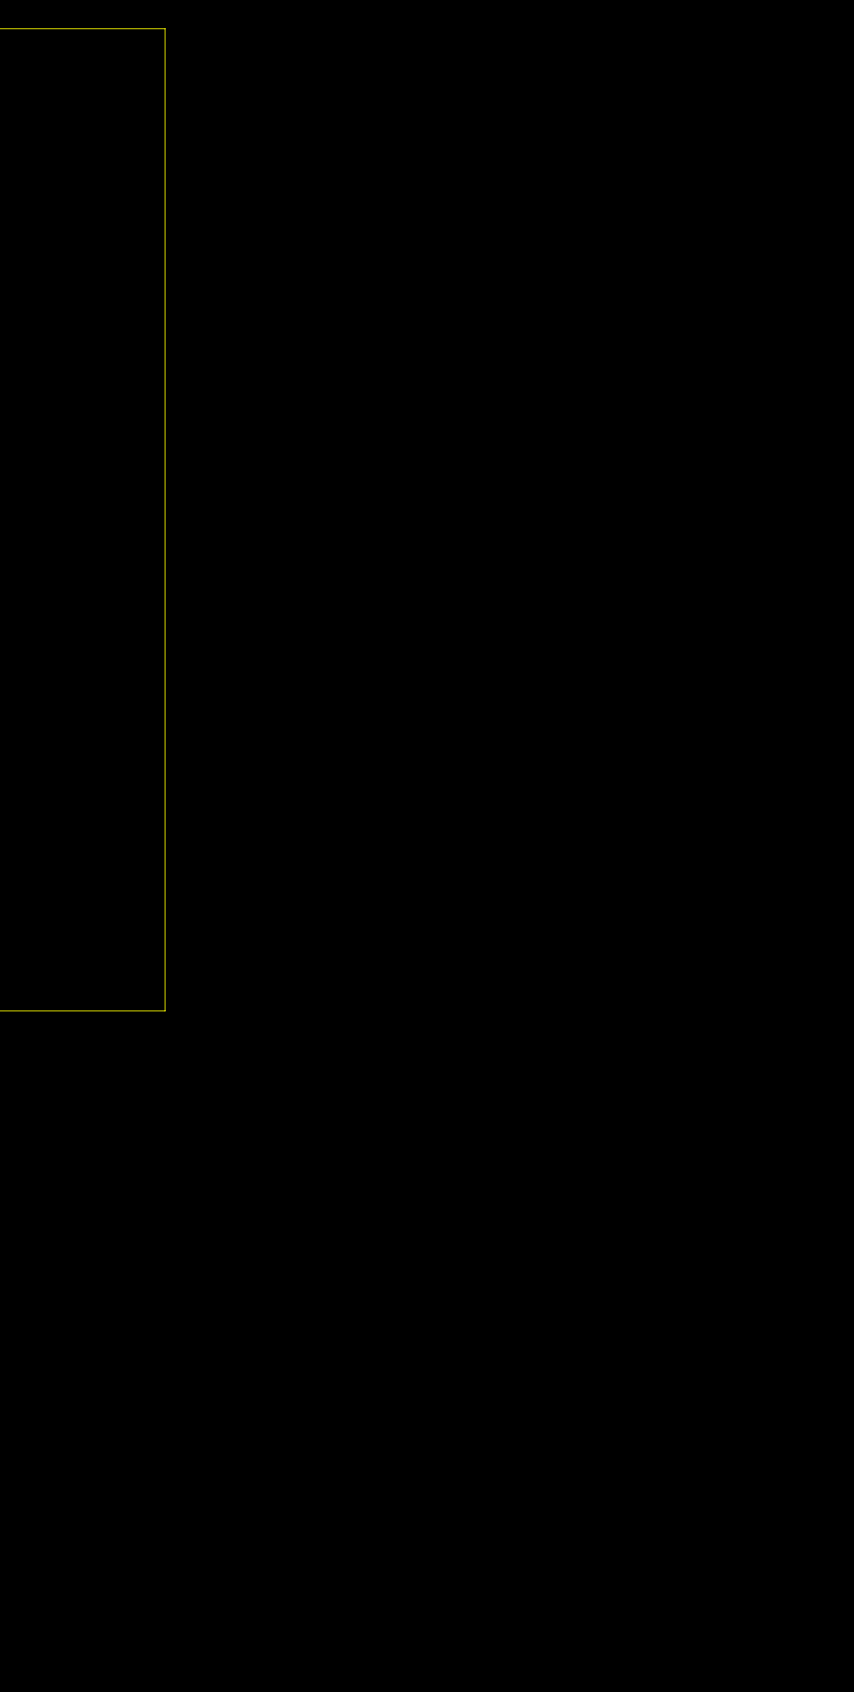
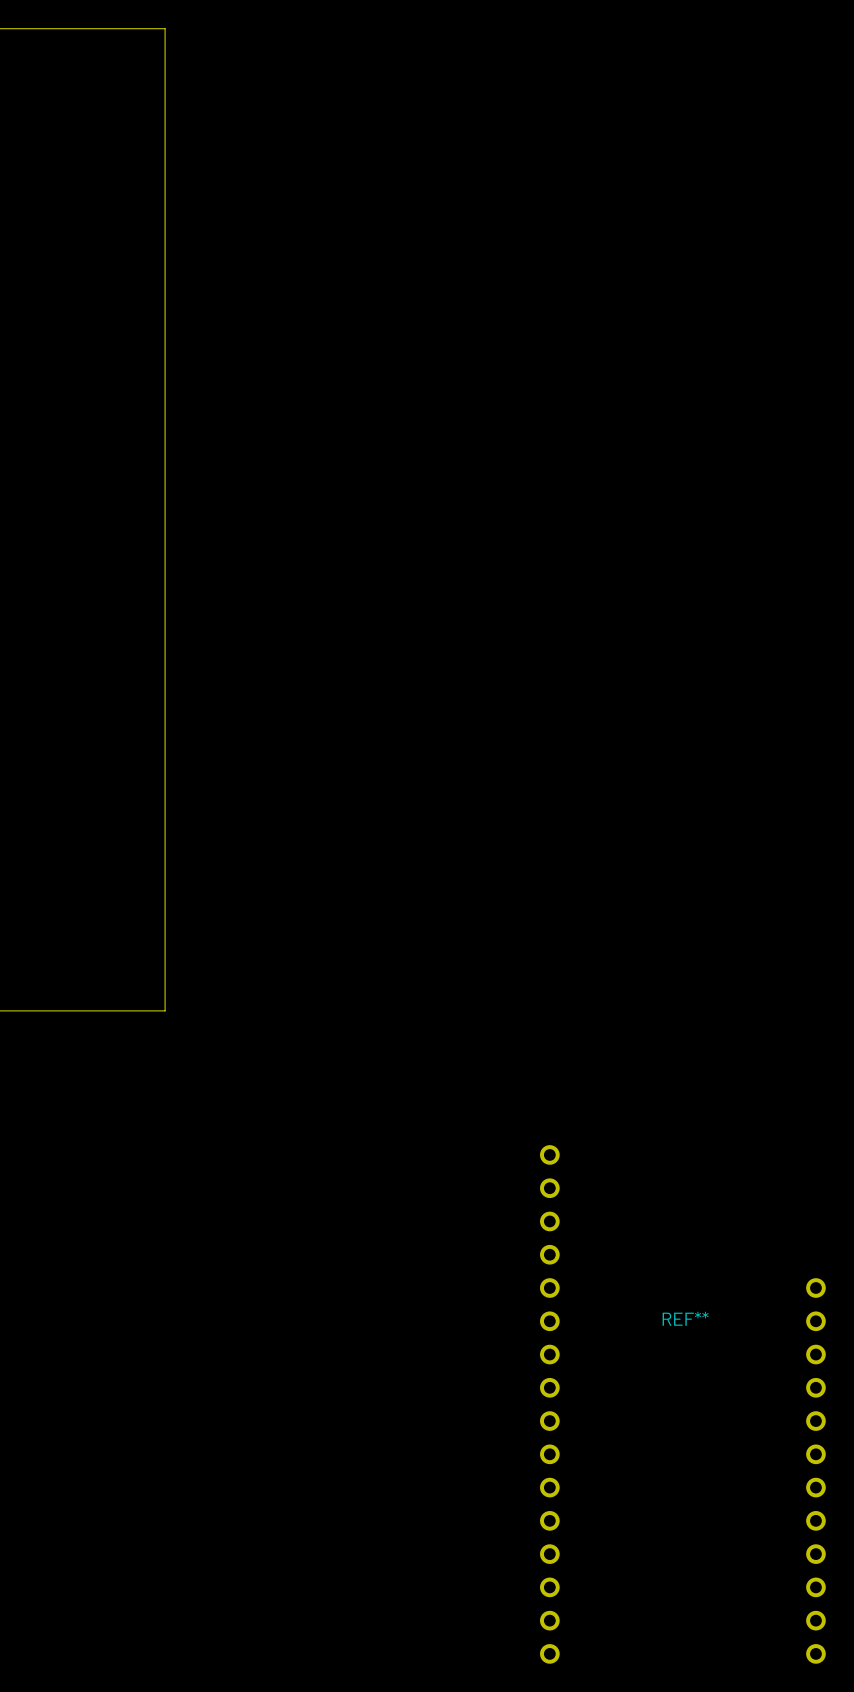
REF**: none -> (682, 1404)

